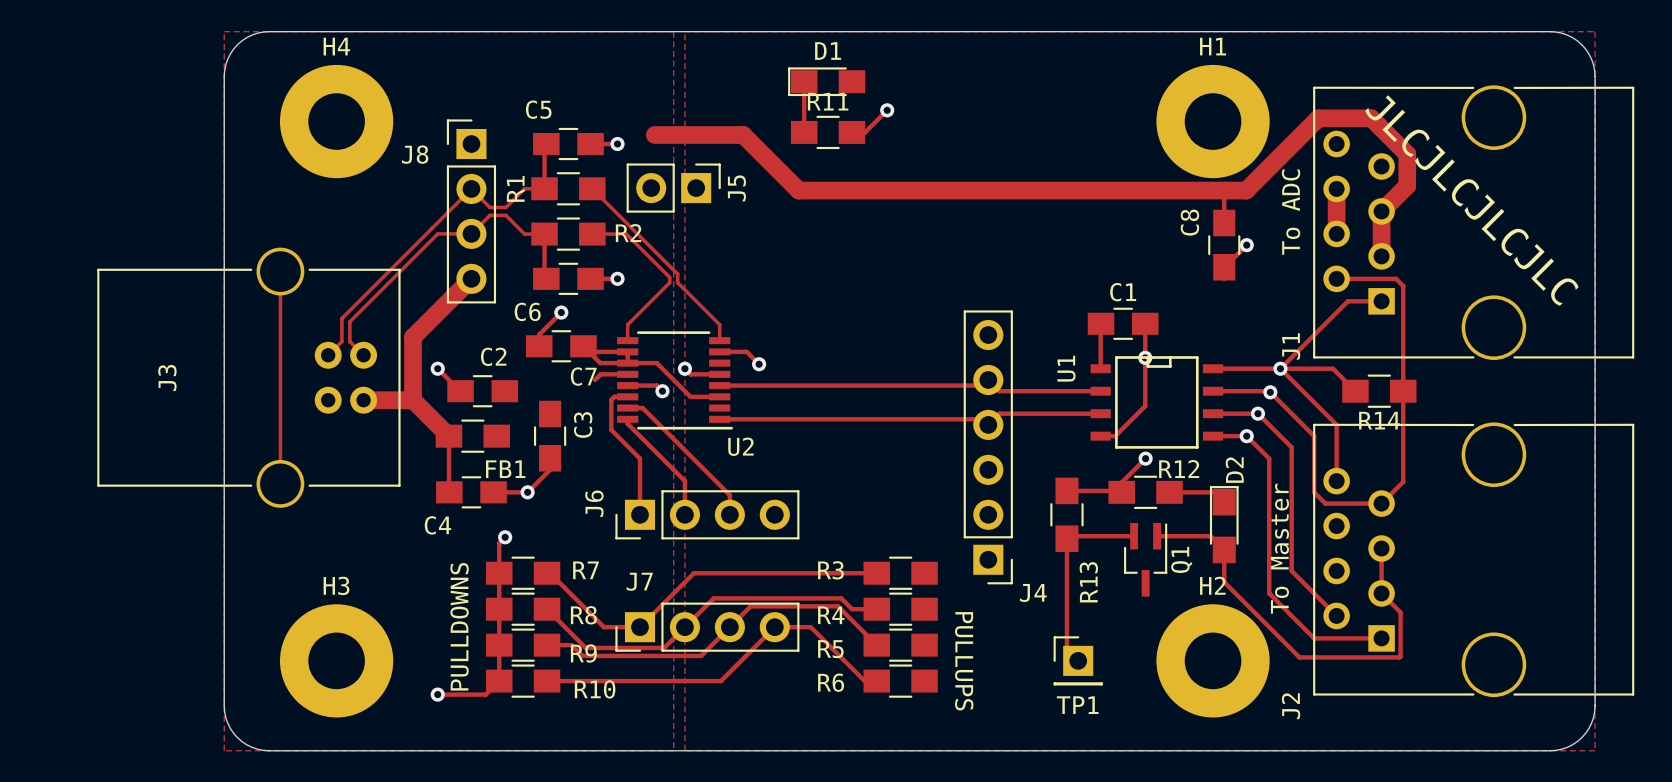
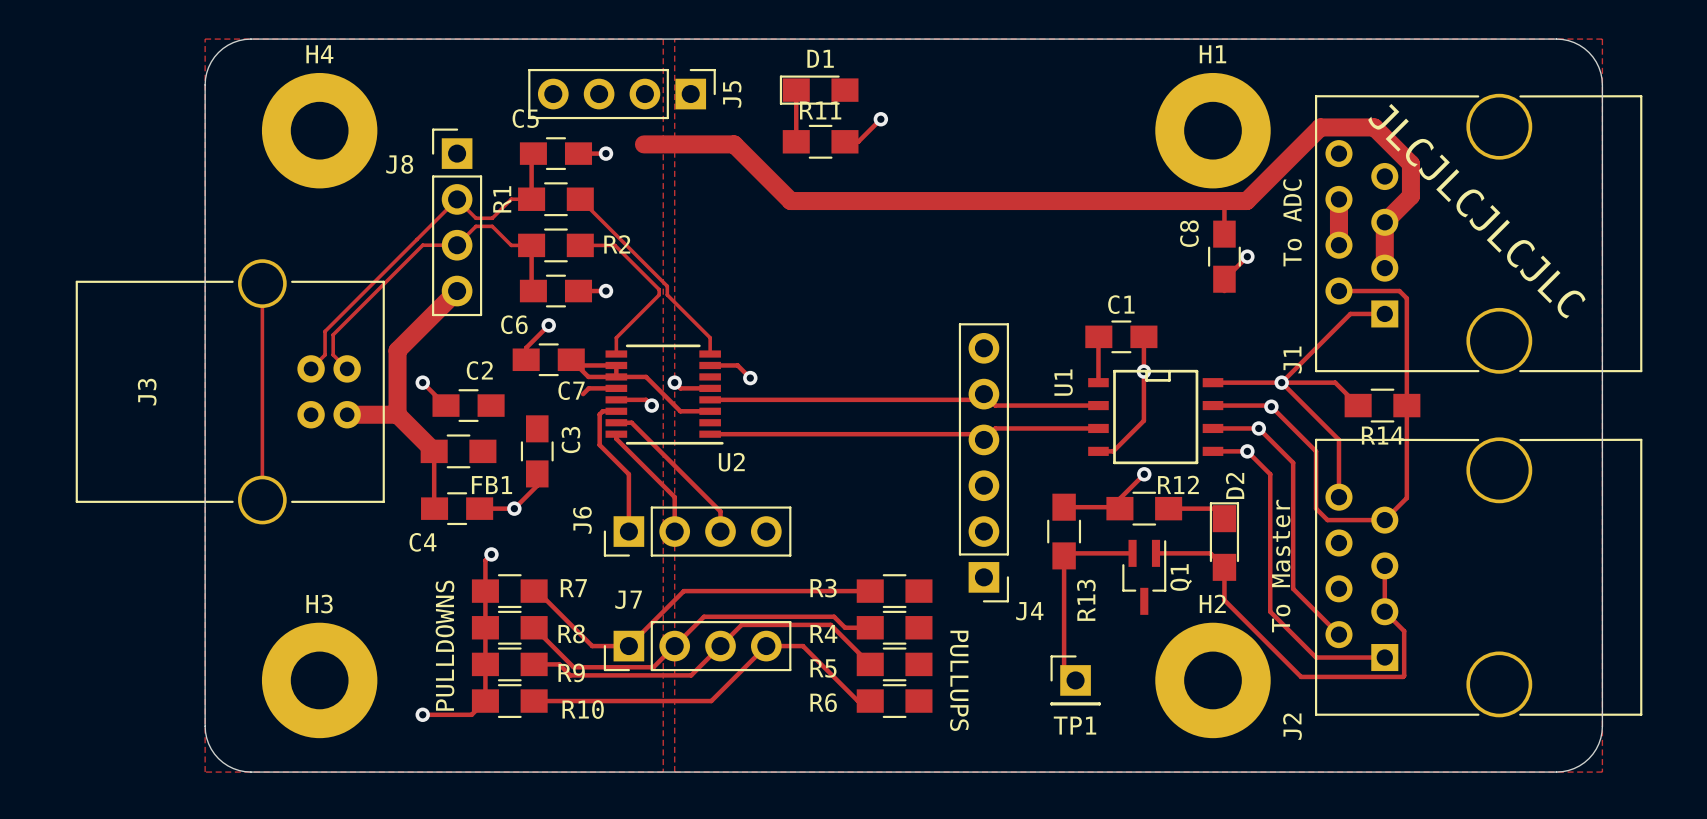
J5 footprint: [626, 163, 721, 213] -> [528, 68, 716, 120]
J5 name position: J5 (736, 188) -> J5 (732, 94)

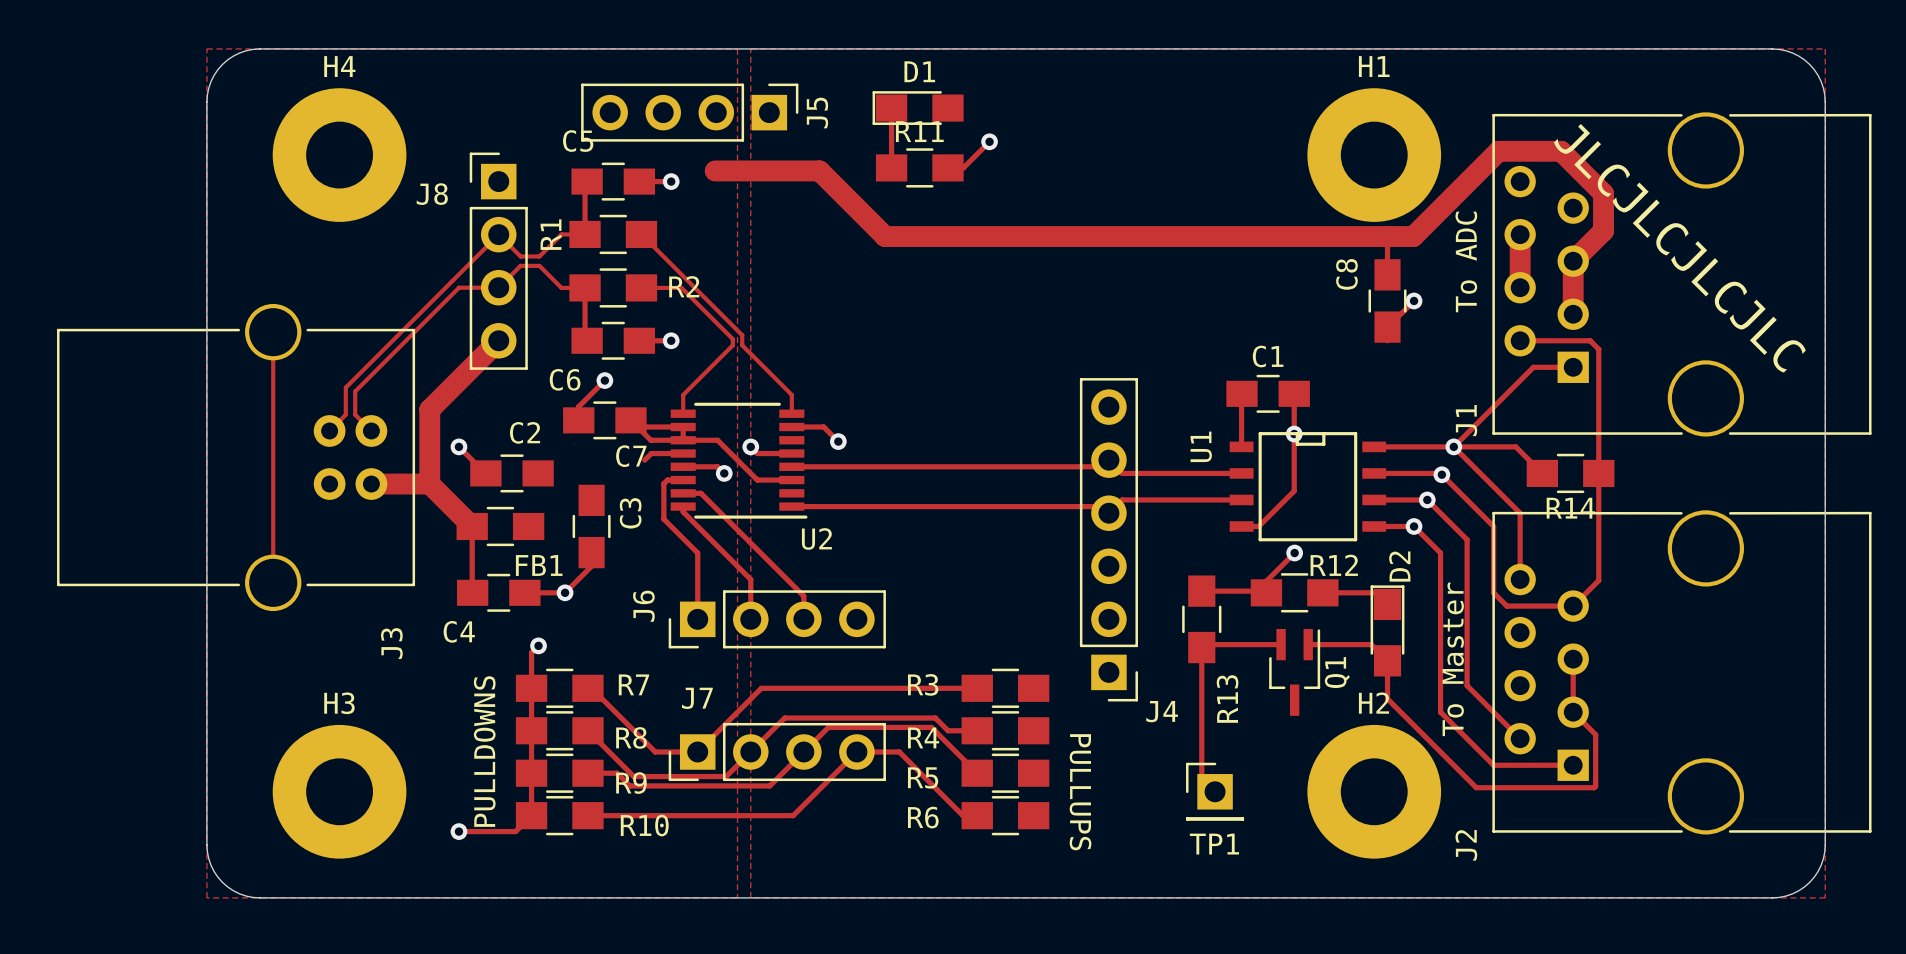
J3 name position: J3 (147, 392) -> J3 (391, 643)

